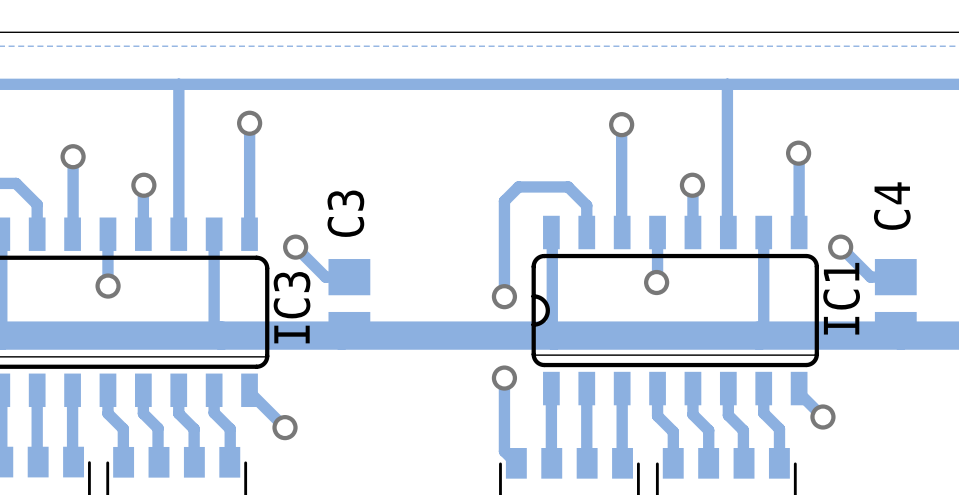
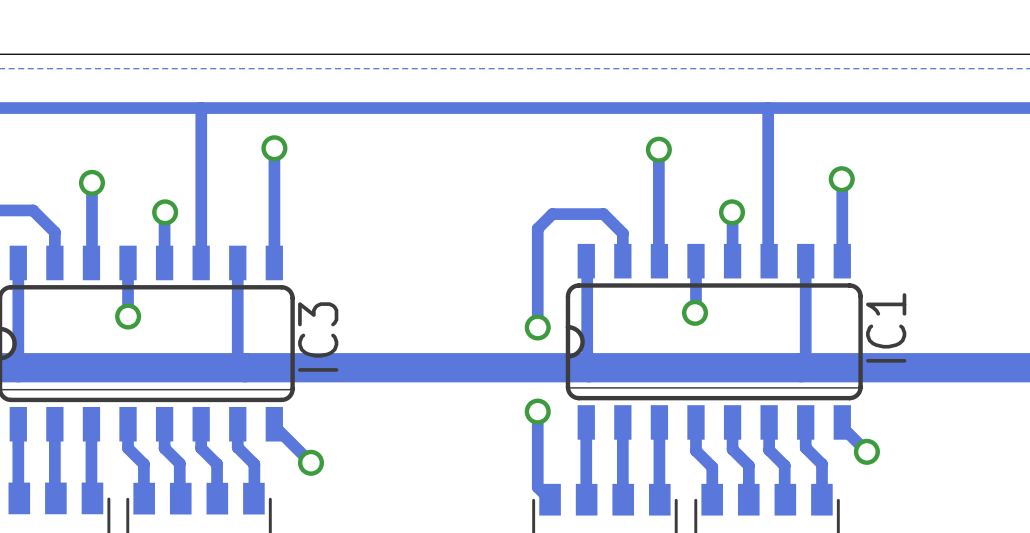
track: (295, 247) (325, 277) (349, 277) -> none
via: (295, 247) -> none
track: (840, 247) (870, 277) (895, 277) -> none
via: (840, 247) -> none
C3: (349, 303) -> none
C4: (895, 303) -> none

